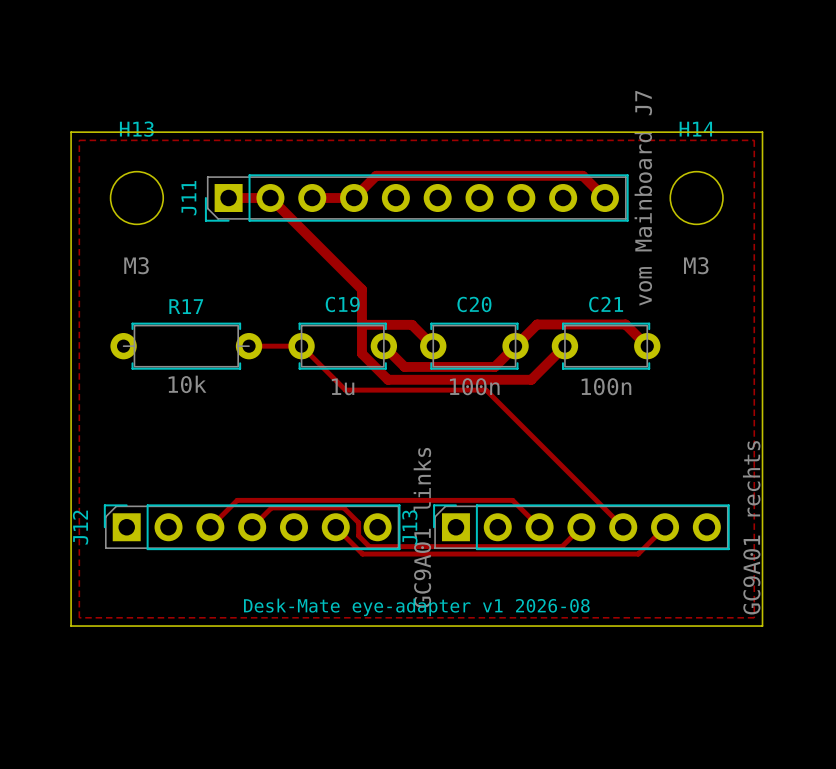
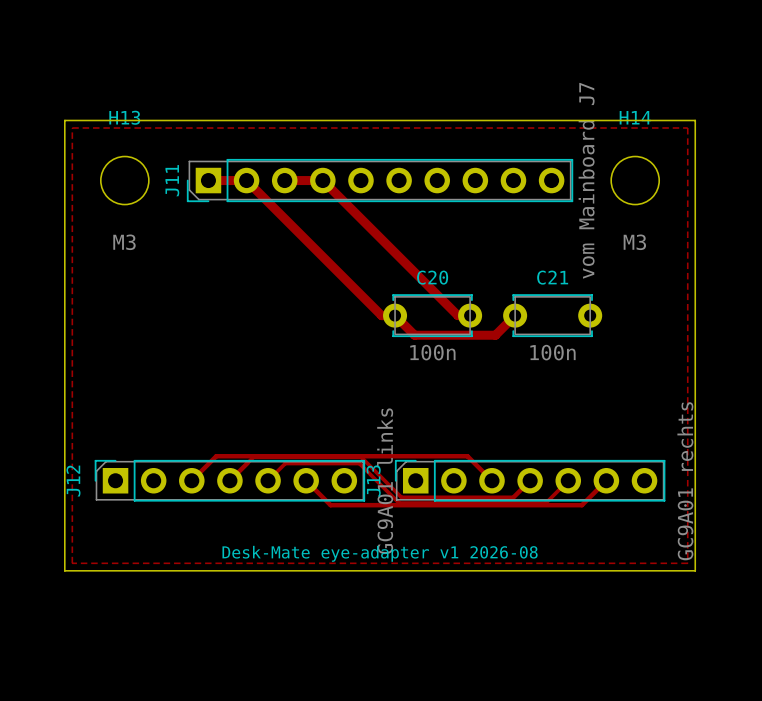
track: (354, 198) (376, 175) (582, 175) (604, 198) -> (322, 180) (457, 315) (470, 315)
track: (361, 289) (361, 353) (388, 379) (531, 379) (543, 367) -> (330, 264) (381, 315) (395, 315) (414, 335) (495, 335)
track: (361, 324) (411, 324) (433, 346) -> none
R17: 10k (186, 346) -> none
track: (249, 346) (301, 346) (345, 390) (486, 390) (623, 527) -> (268, 480) (285, 463) (359, 463) (399, 503) (545, 503) (568, 480)
C19: 1u (342, 346) -> none
track: (383, 346) (404, 366) (494, 366) (537, 324) (625, 324) (647, 346) -> none
track: (271, 507) (343, 507) (358, 522) (358, 535) (369, 546) (563, 545) -> (247, 463) (253, 457) (361, 457) (401, 497) (513, 497)

